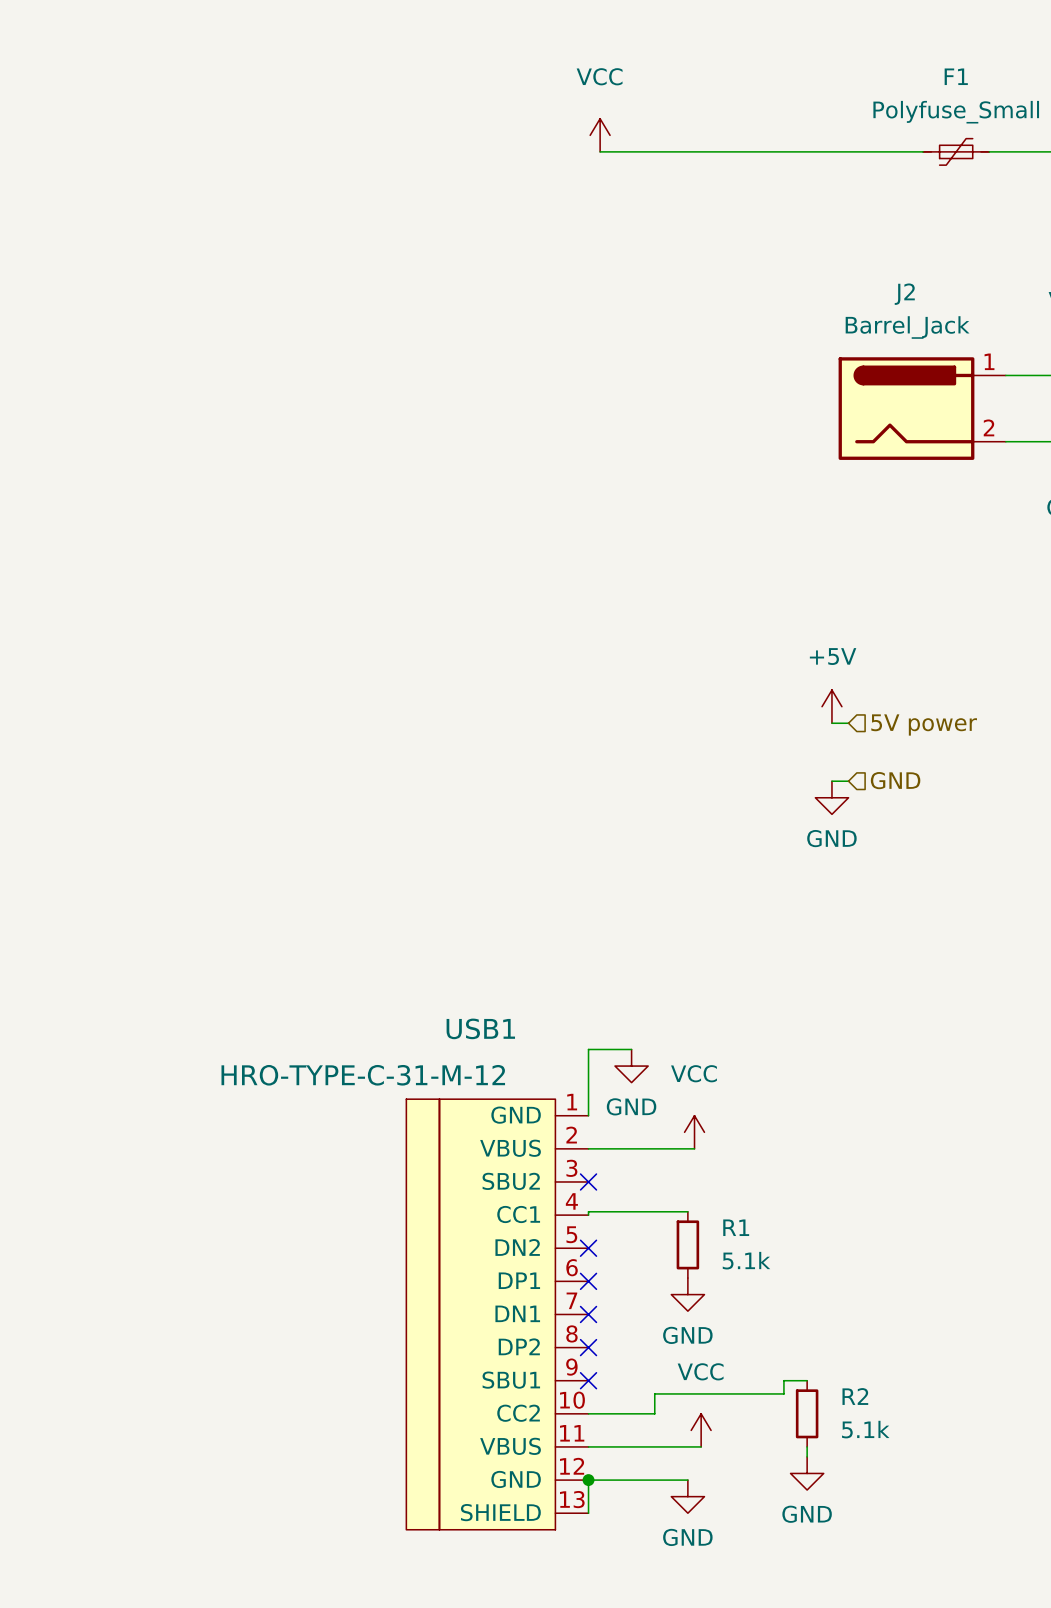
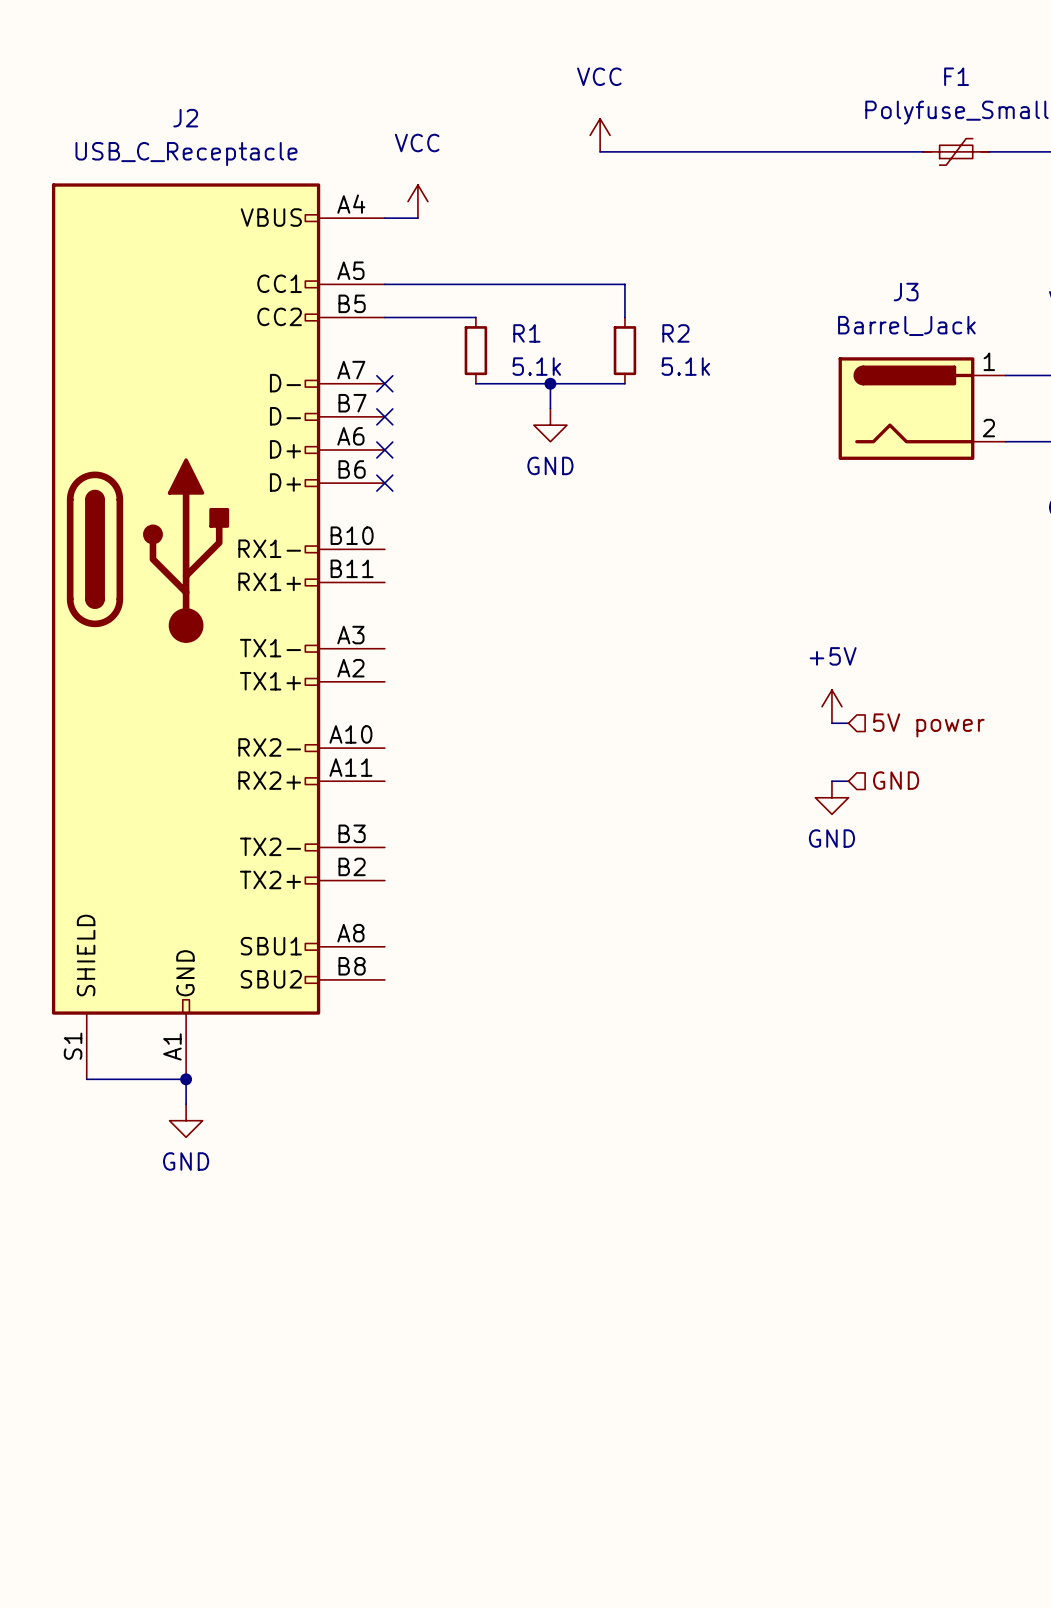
power symbol: none -> VCC (417, 201)
wire: none -> (384, 218) (417, 218)
wire: none -> (384, 284) (624, 284) (624, 317)
J2 name: J2 (904, 294) -> J3 (906, 292)
wire: none -> (384, 317) (475, 317)
no-connect mark: none -> (384, 383)
wire: none -> (475, 383) (624, 383)
wire: none -> (550, 383) (550, 408)
junction: none -> (550, 383)
no-connect mark: none -> (384, 416)
power symbol: none -> GND (550, 425)
no-connect mark: none -> (384, 449)
no-connect mark: none -> (384, 483)
J2: none -> USB_C_Receptacle (218, 631)
wire: (631, 1049) (588, 1049) (588, 1115) -> none
power symbol: GND (631, 1066) -> none
wire: none -> (86, 1079) (186, 1079) (186, 1104)
junction: none -> (186, 1079)
power symbol: none -> GND (186, 1120)
power symbol: VCC (694, 1132) -> none
wire: (588, 1148) (694, 1148) -> none
no-connect mark: (588, 1181) -> none
wire: (687, 1211) (588, 1211) (588, 1215) -> none
R1 position: (687, 1244) -> (475, 350)
no-connect mark: (588, 1248) -> none
no-connect mark: (588, 1281) -> none
power symbol: GND (687, 1294) -> none
USB1: HRO-TYPE-C-31-M-12 (497, 1314) -> none
no-connect mark: (588, 1314) -> none
no-connect mark: (588, 1347) -> none
no-connect mark: (588, 1380) -> none
wire: (807, 1380) (783, 1380) (783, 1393) (654, 1393) (654, 1413) (588, 1413) -> none
R2 position: (807, 1413) -> (624, 350)
power symbol: VCC (701, 1430) -> none
wire: (588, 1446) (701, 1446) -> none
wire: (807, 1446) (807, 1456) -> none
power symbol: GND (807, 1473) -> none
junction: (588, 1480) -> none
wire: (687, 1480) (588, 1480) (588, 1513) -> none
power symbol: GND (687, 1496) -> none

